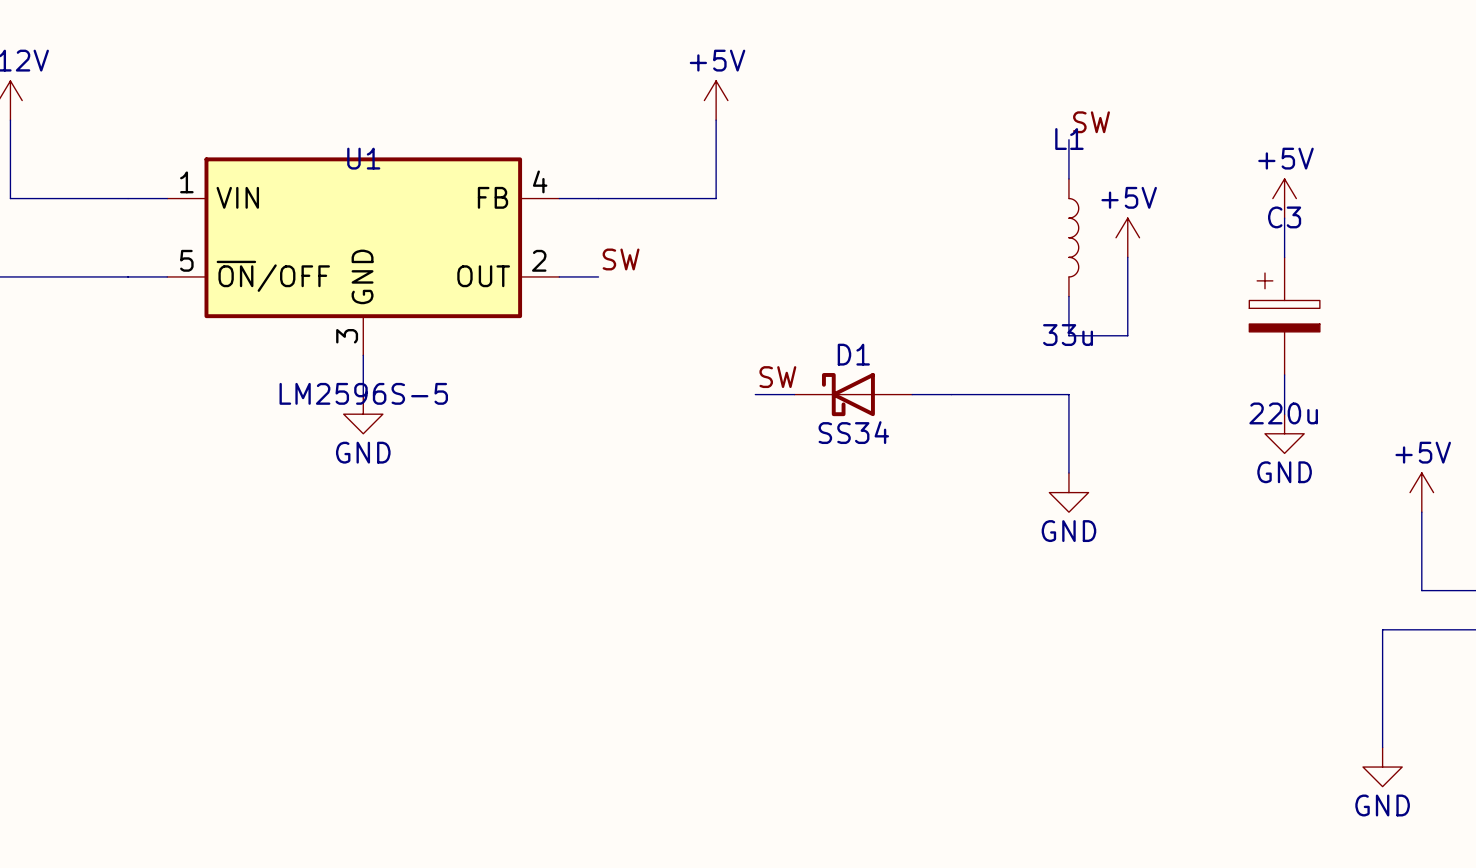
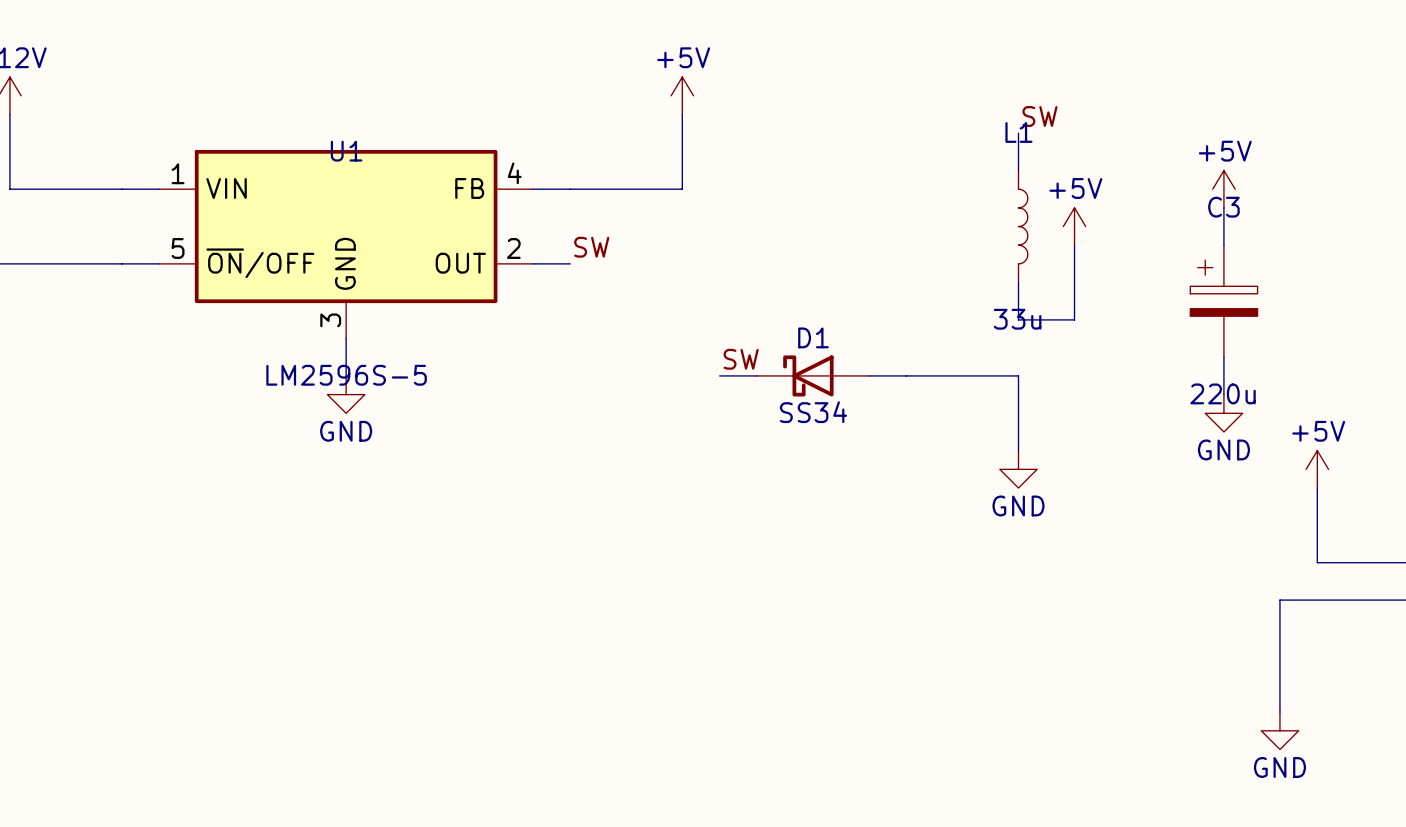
power symbol position: +5V (1421, 492) -> +5V (1317, 469)
wire: (1421, 512) (1421, 590) -> (1317, 488) (1317, 562) (1354, 562)
wire: (1382, 629) (1382, 747) -> (1317, 600) (1279, 600) (1279, 712)
power symbol position: GND (1382, 767) -> GND (1279, 730)

